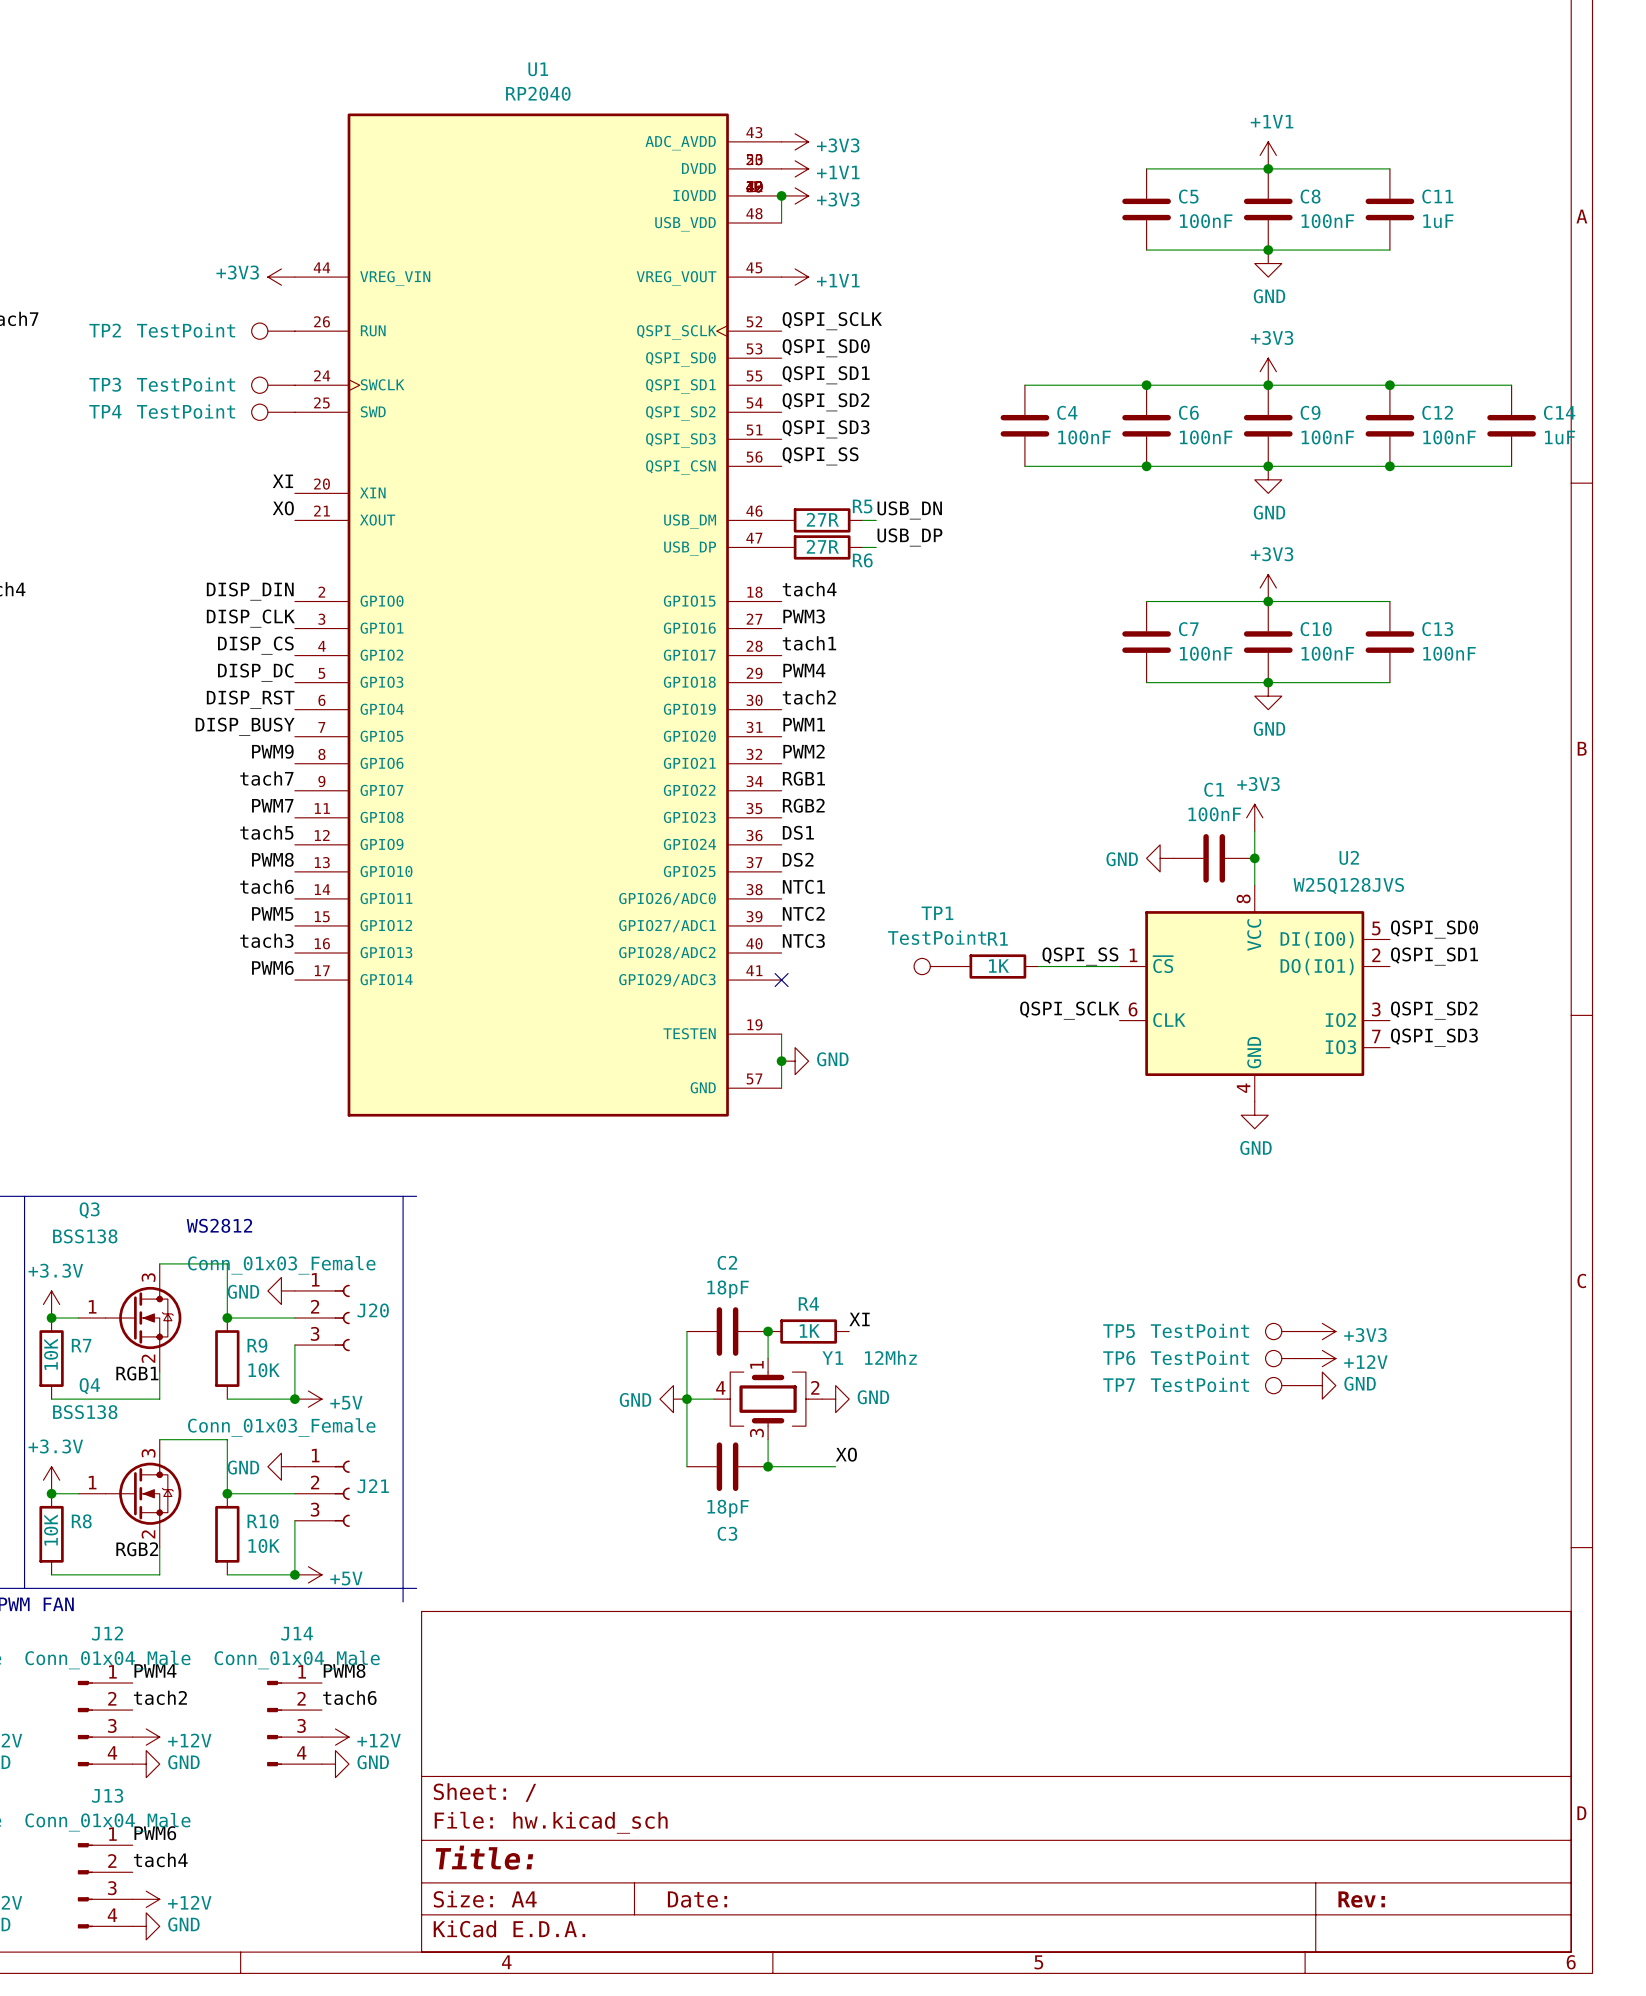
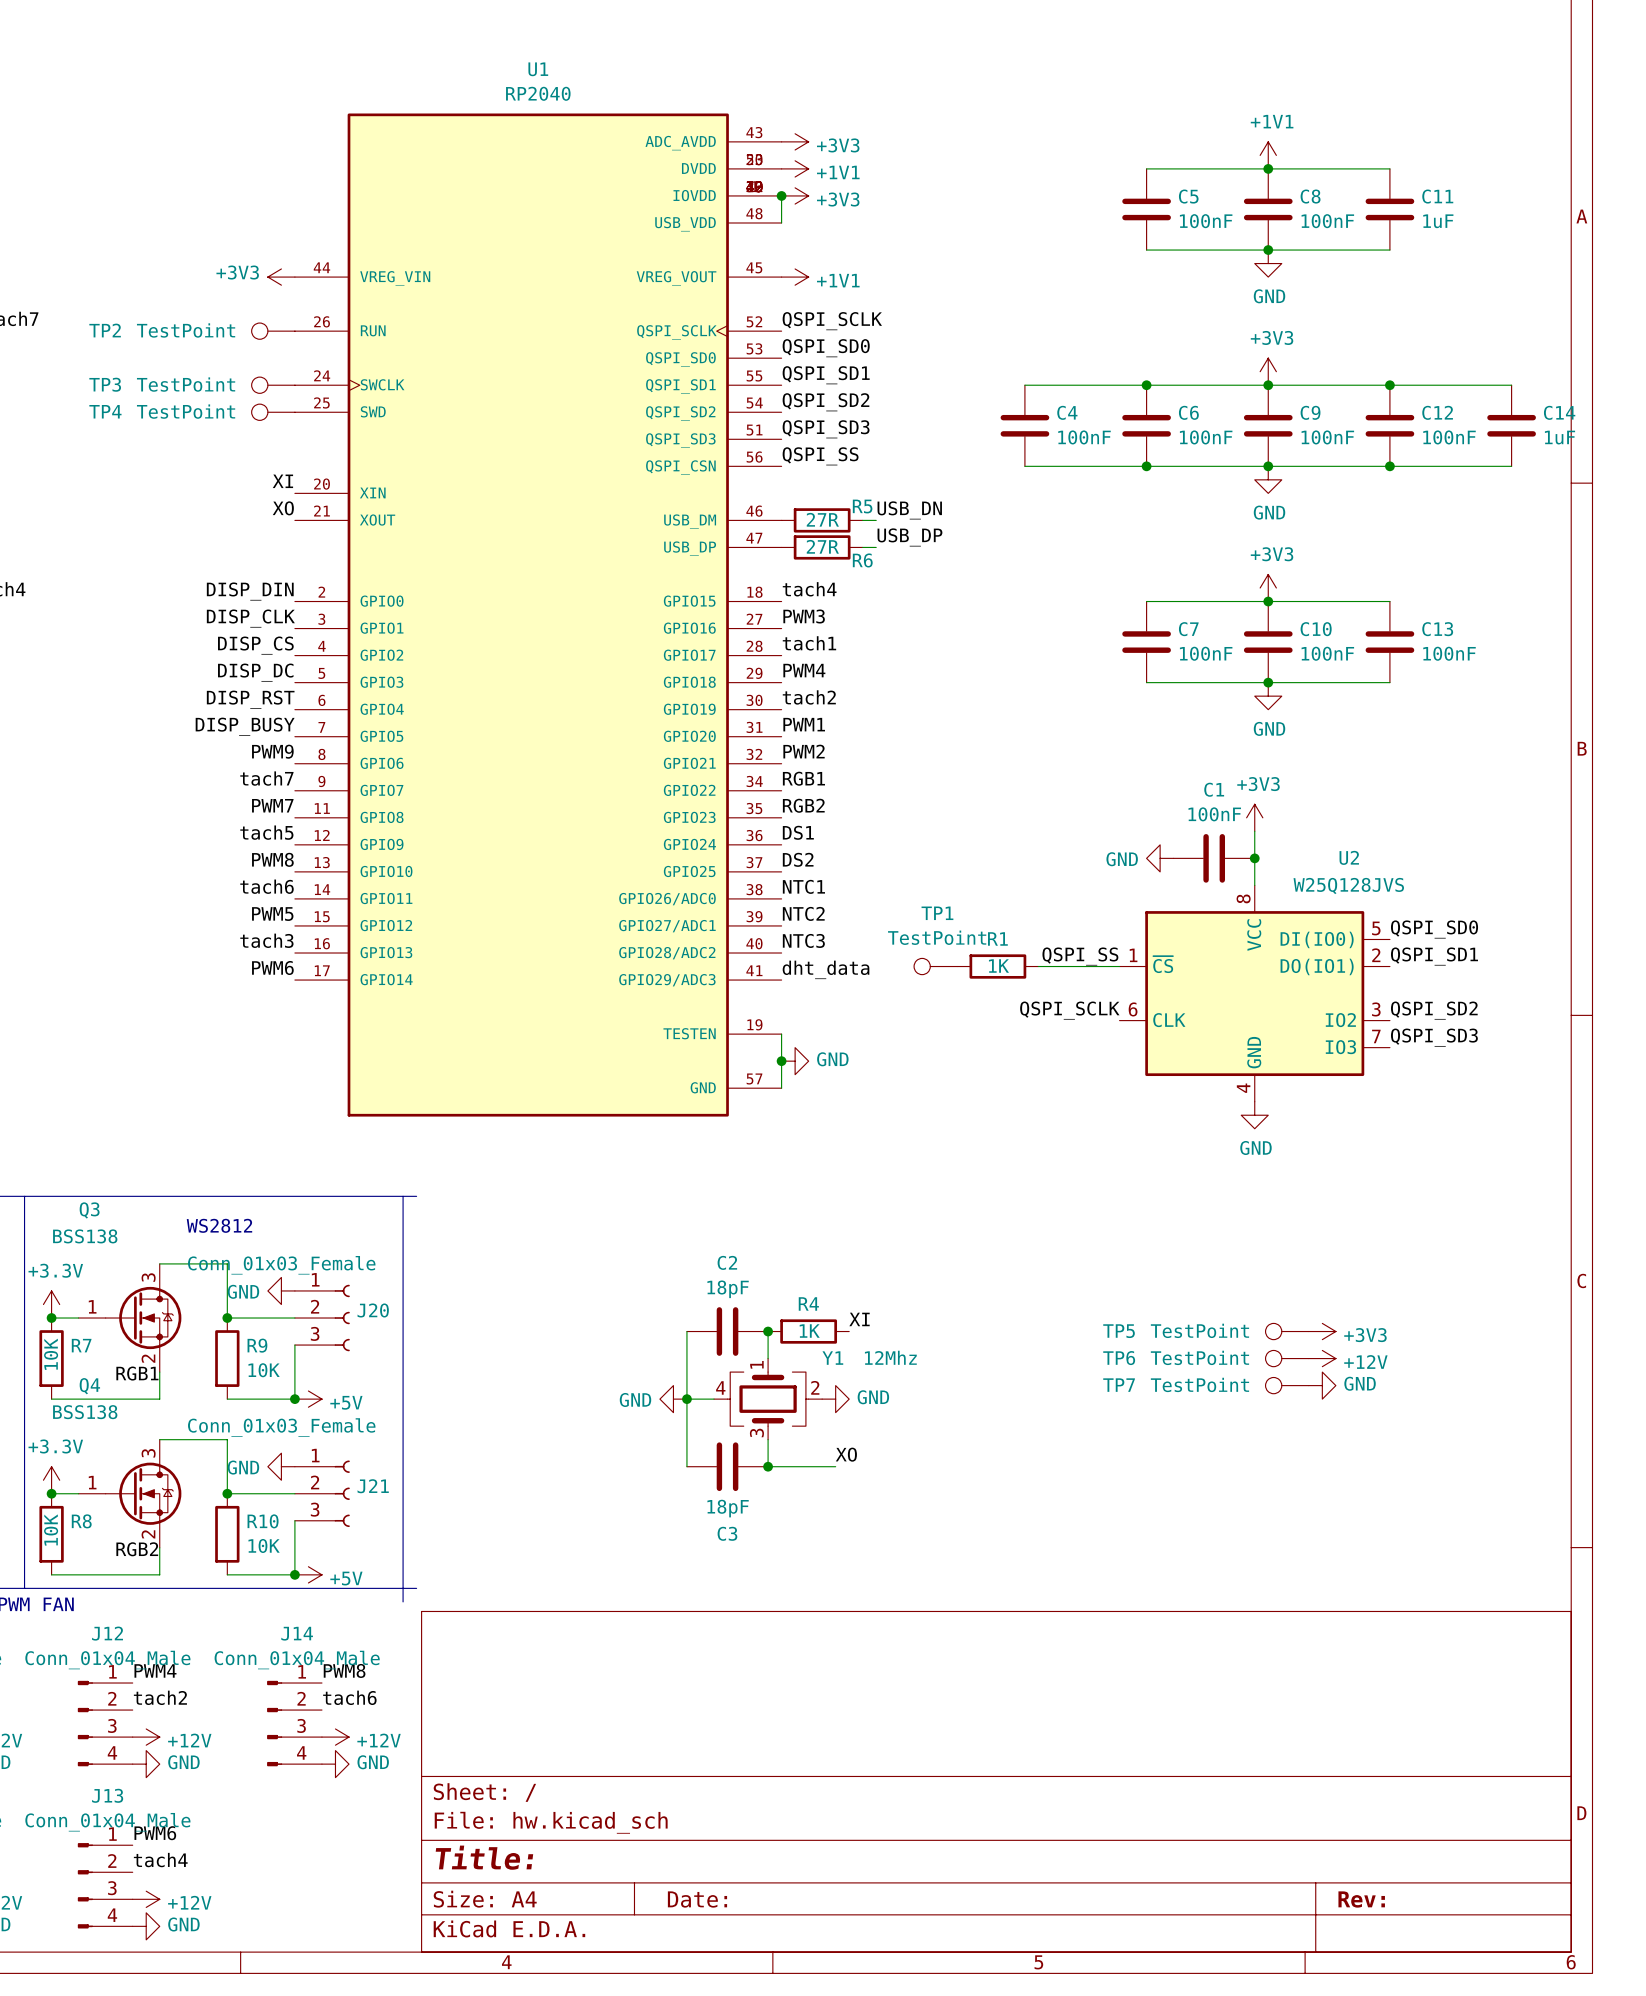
label: none -> dht_data (826, 969)
no-connect mark: (781, 980) -> none

